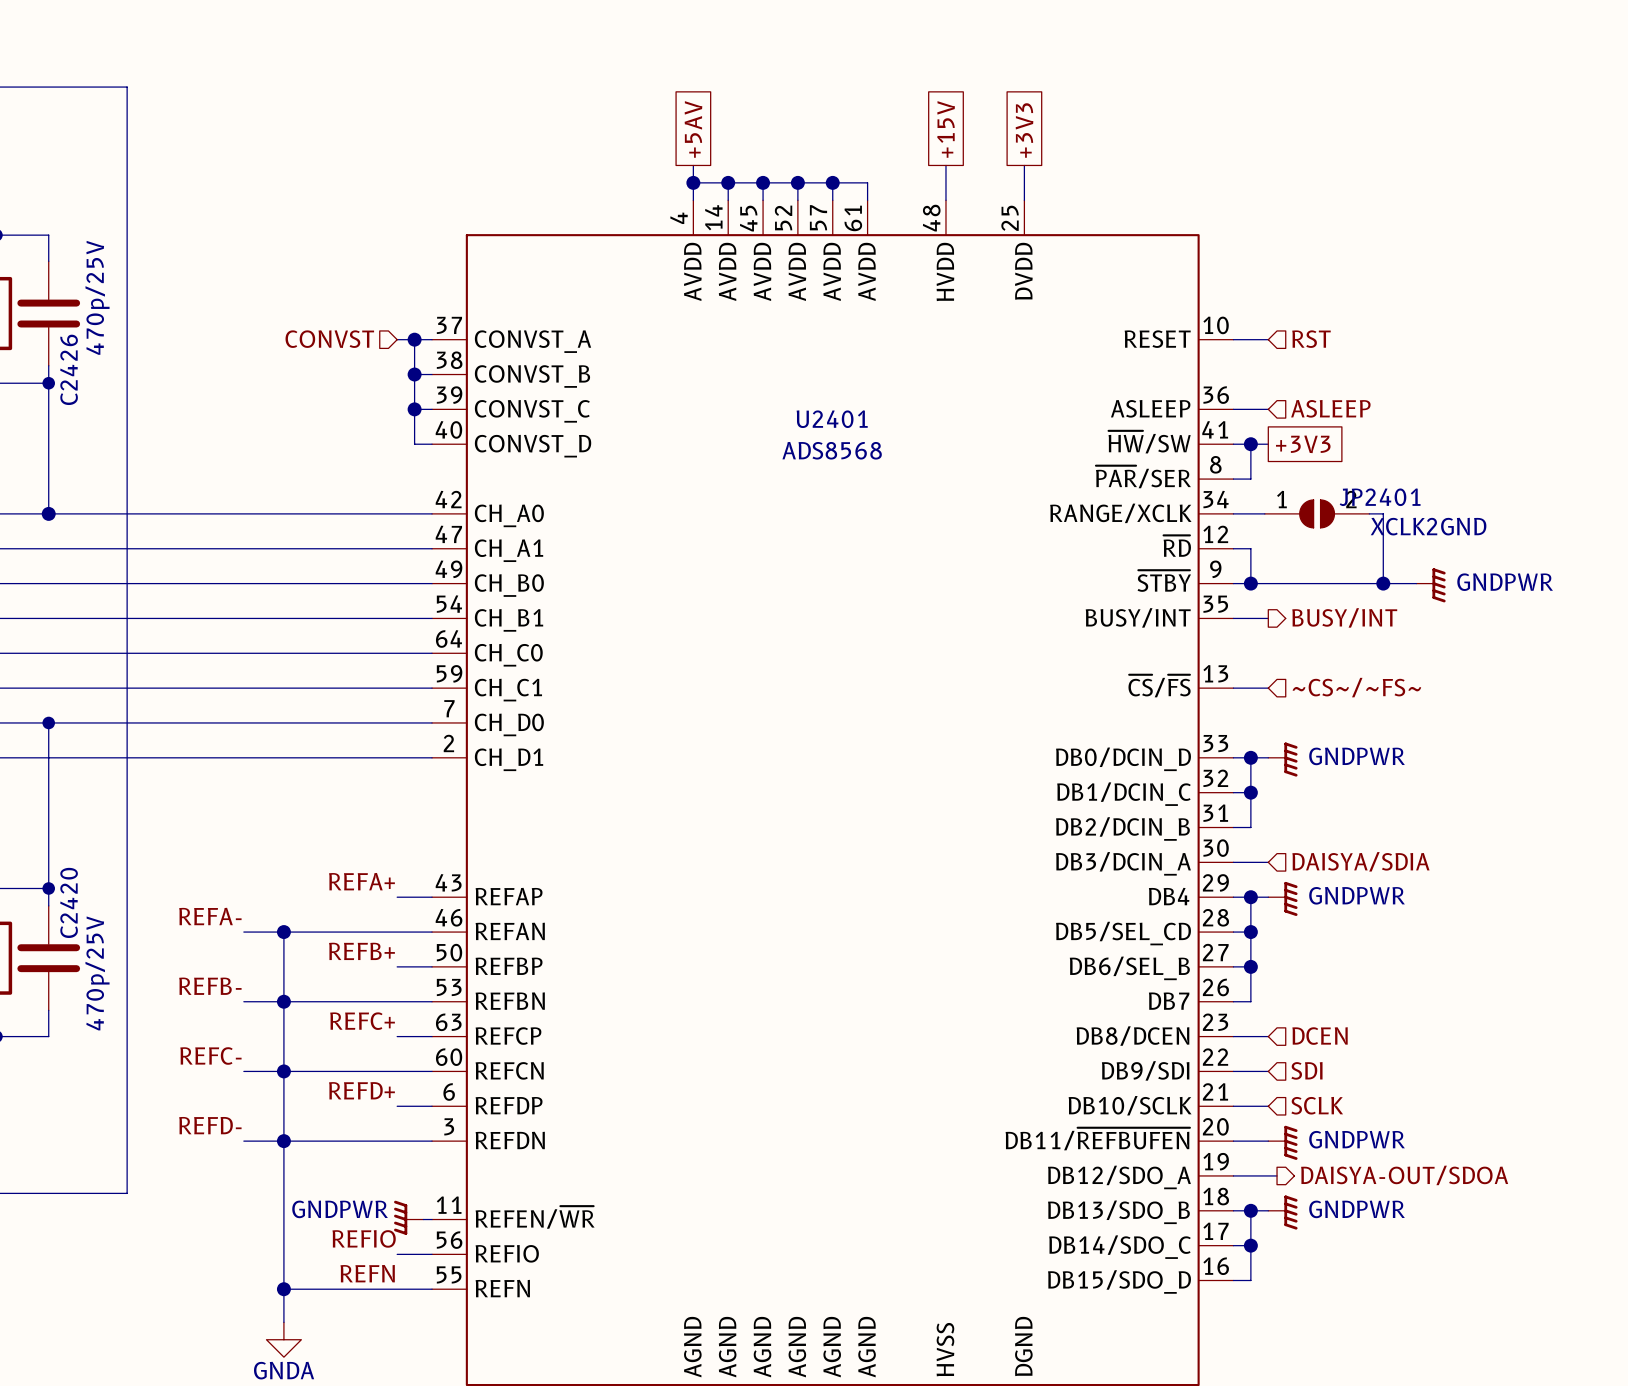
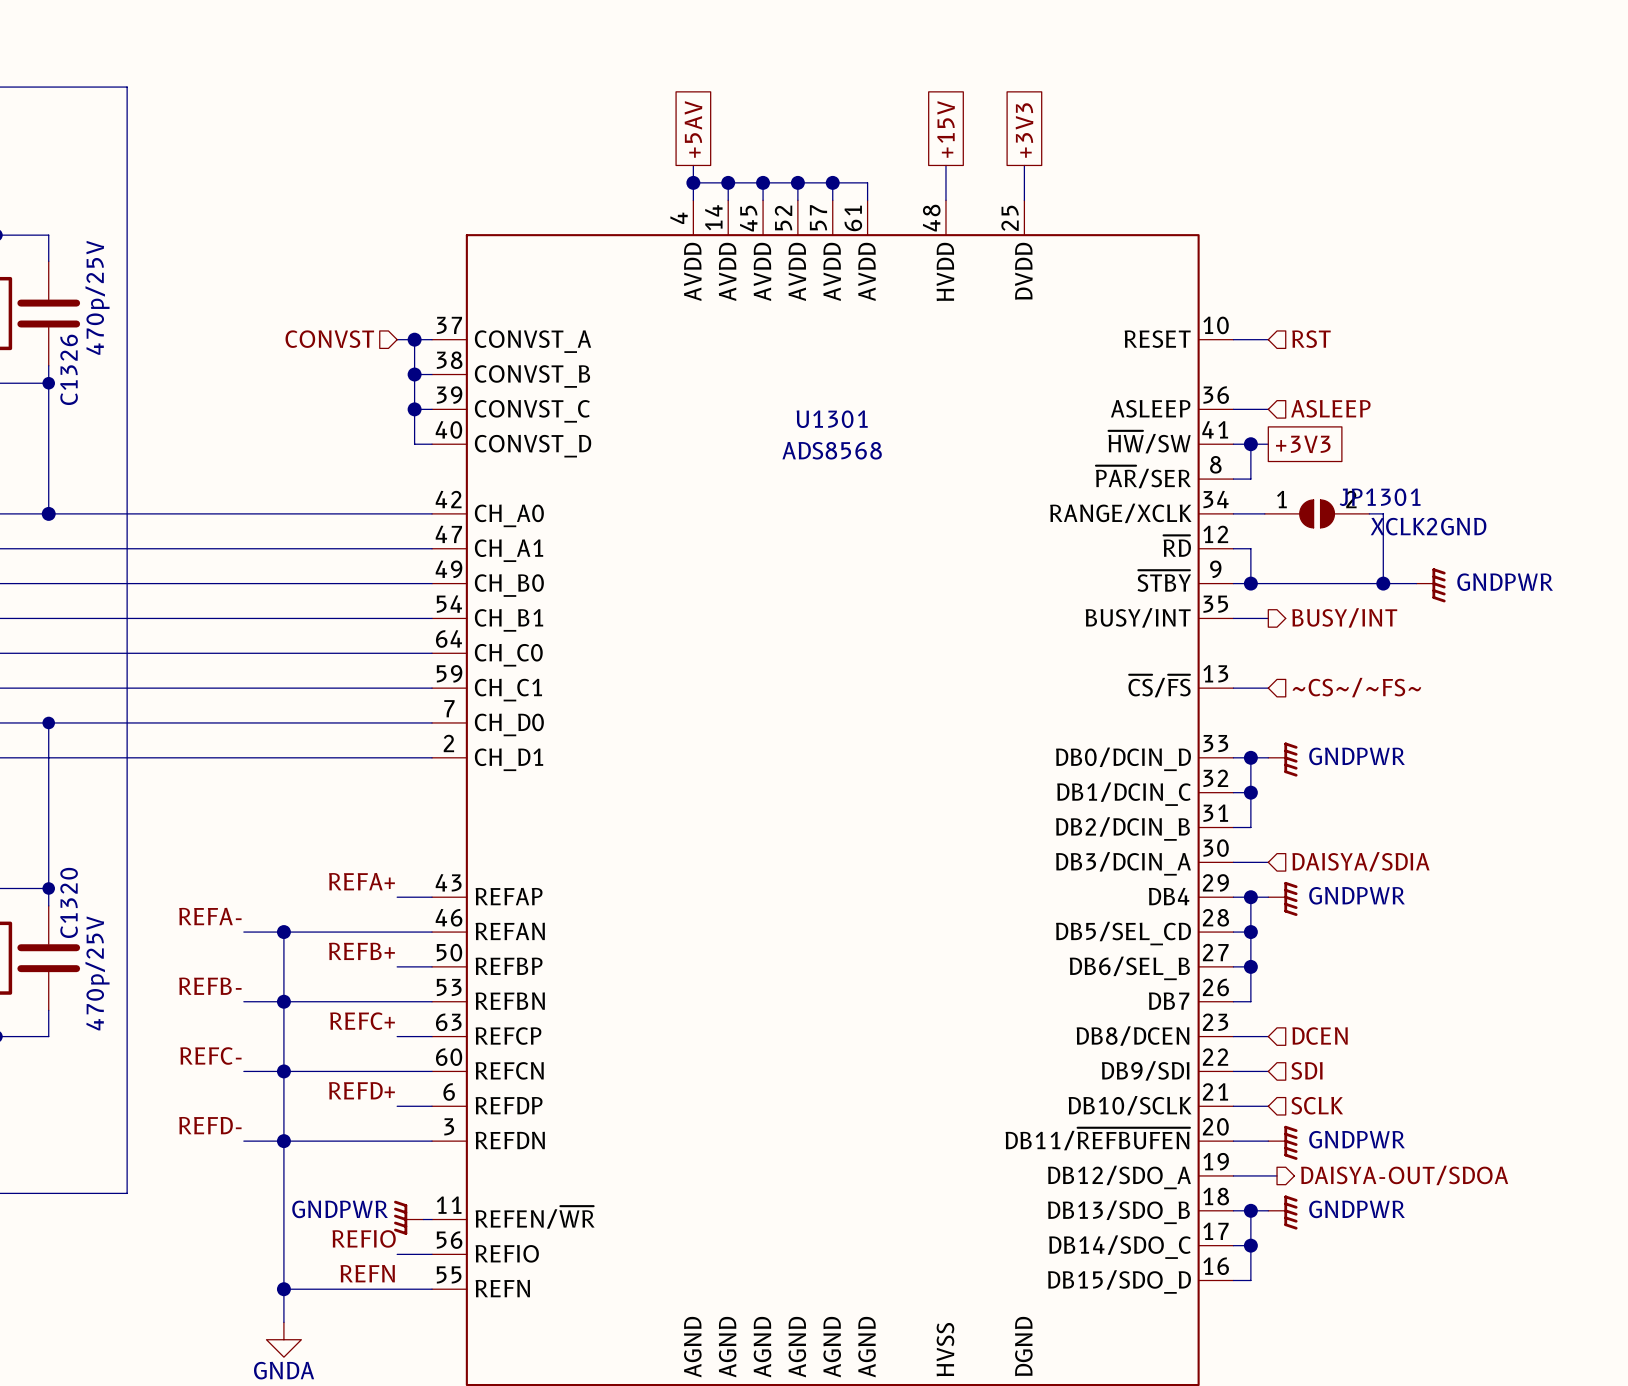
C2426 name: C2426 (69, 369) -> C1326 (69, 369)
U2401 name: U2401 (832, 419) -> U1301 (832, 419)
JP2401 name: JP2401 (1380, 497) -> JP1301 (1380, 497)
C2420 name: C2420 (69, 902) -> C1320 (69, 902)

